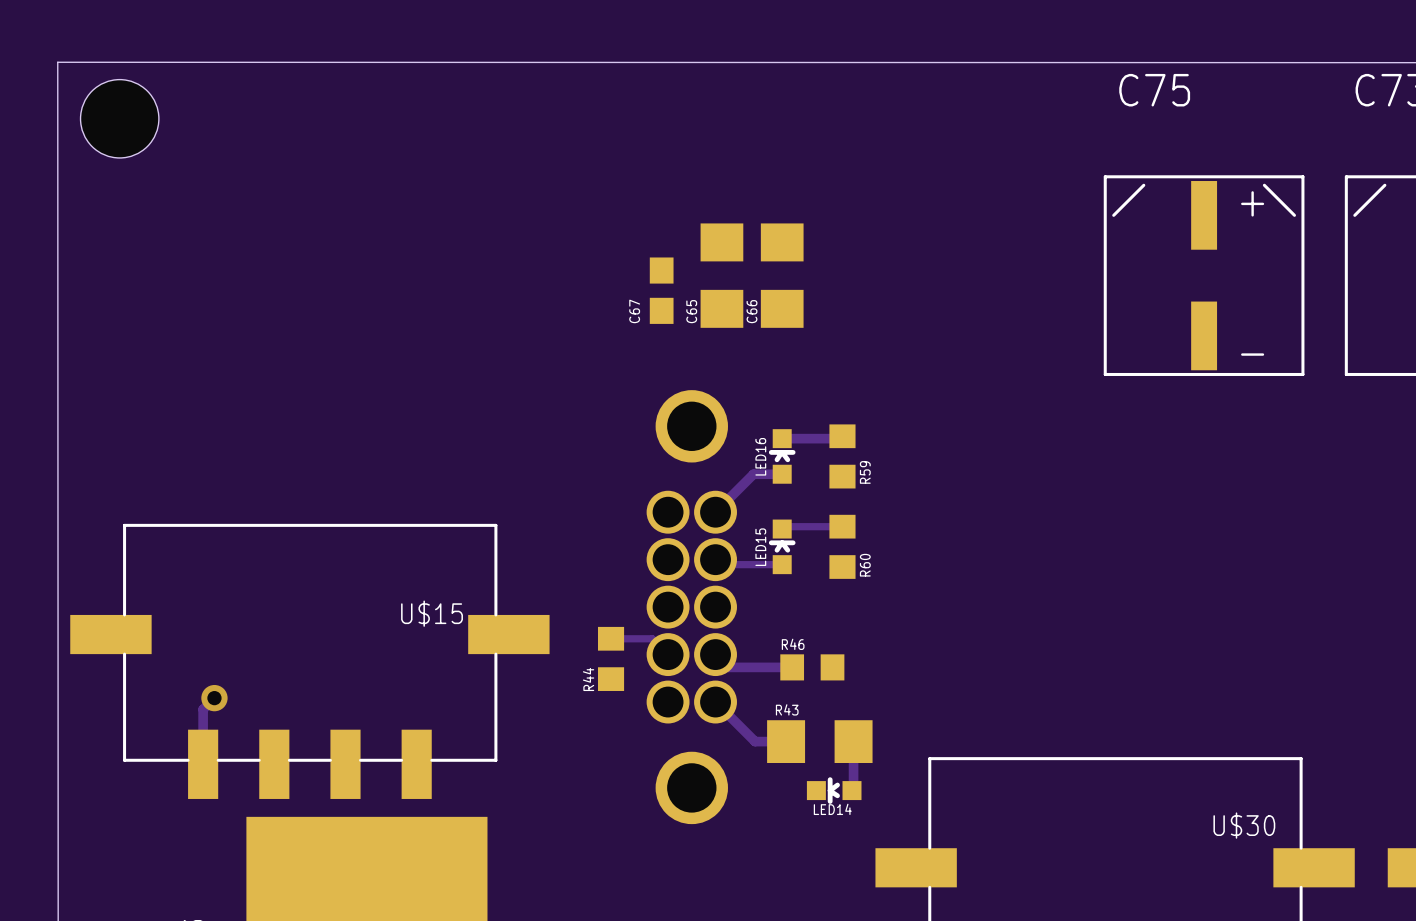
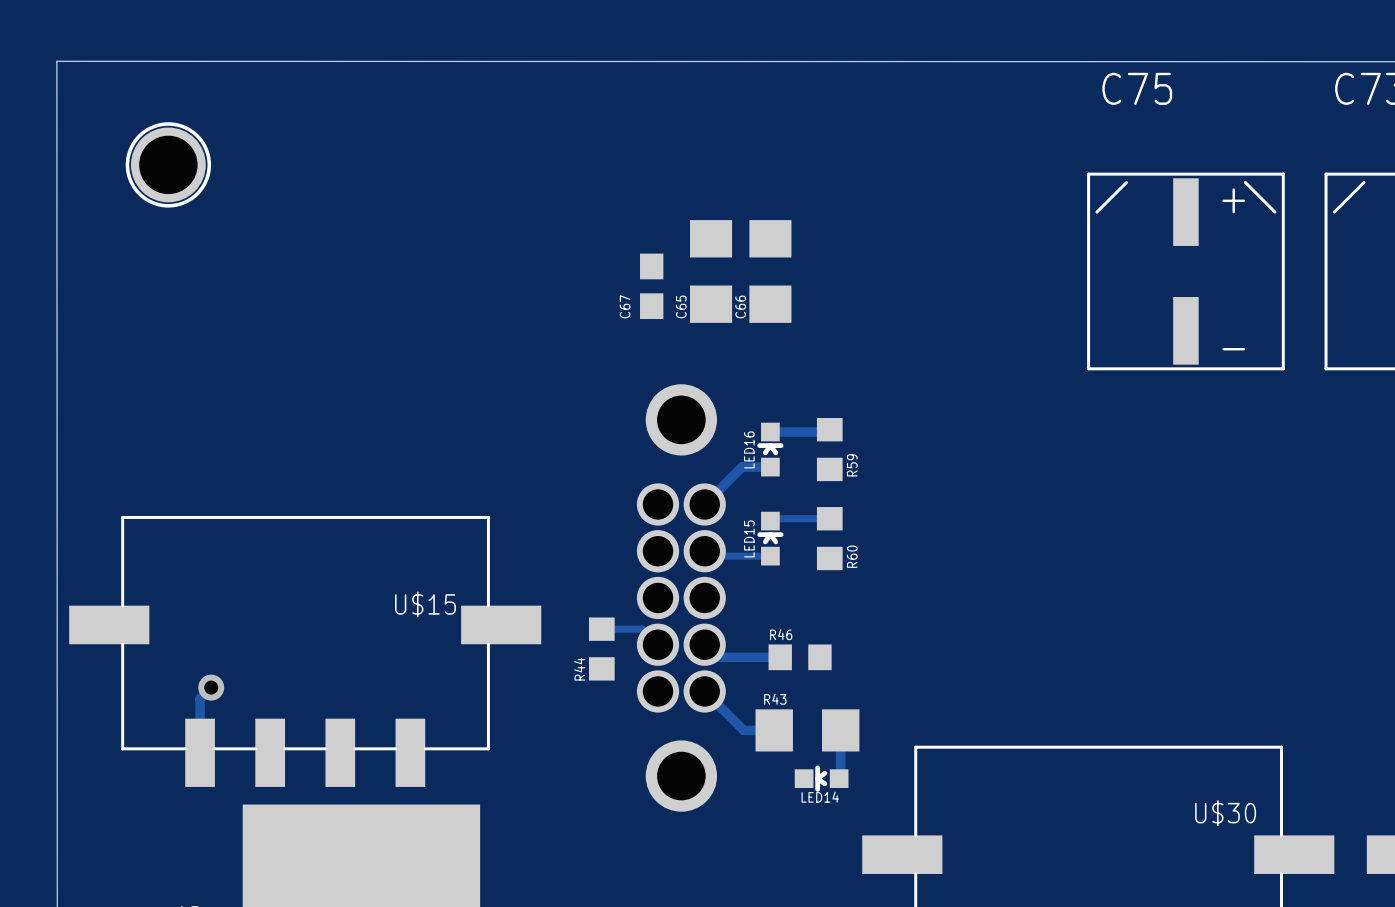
part: (119, 118) -> none
part: none -> (168, 164)

